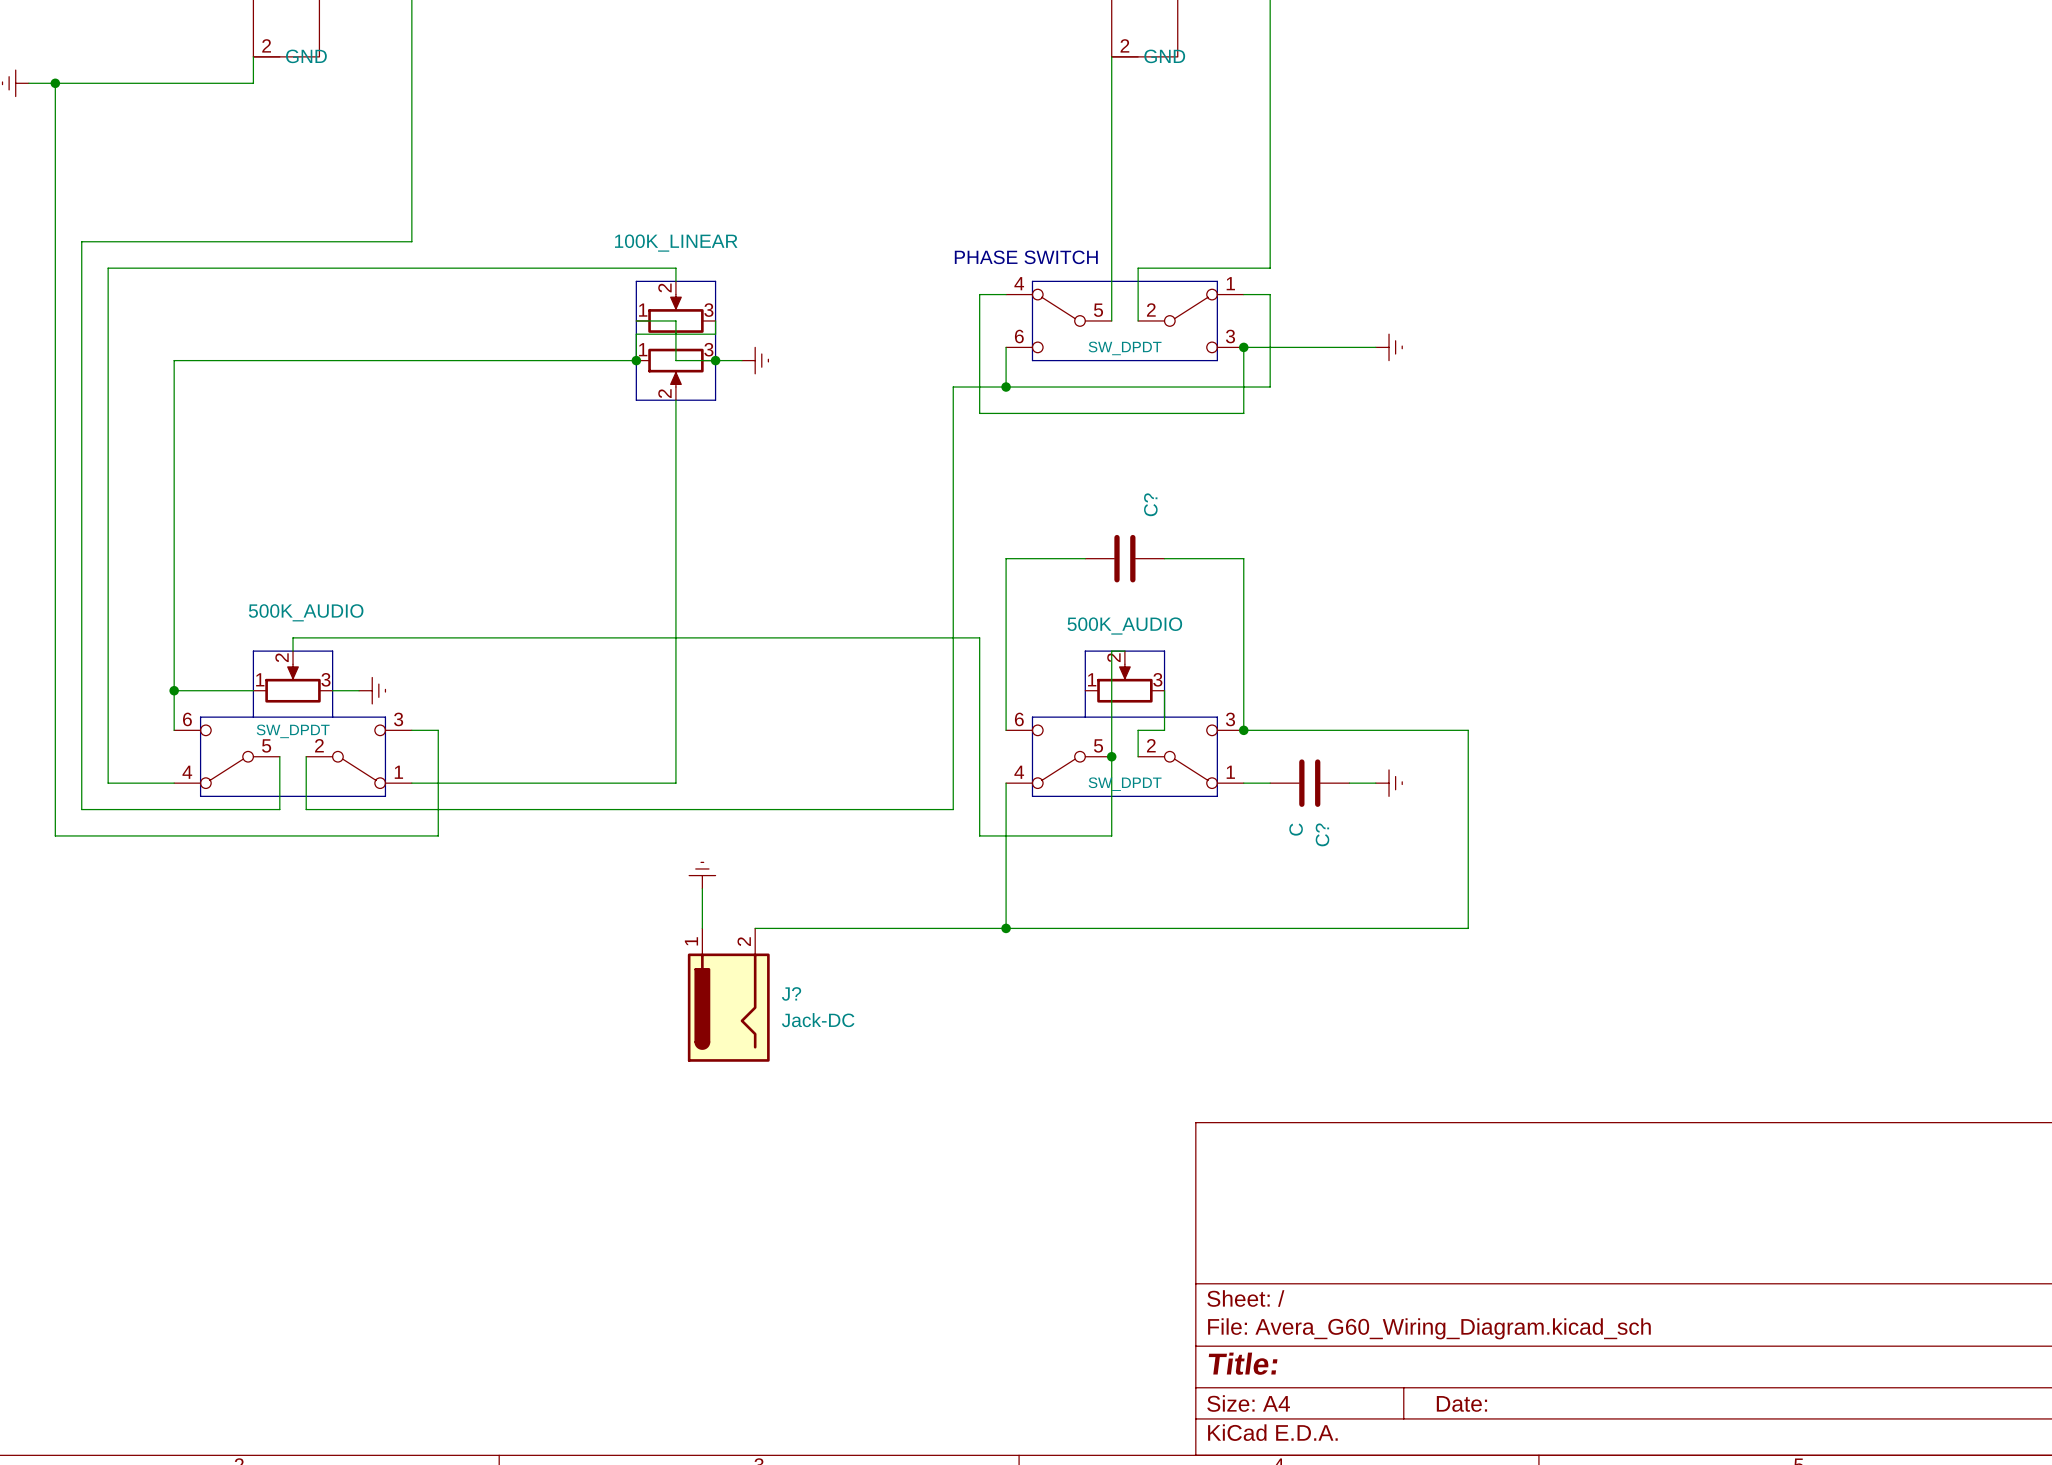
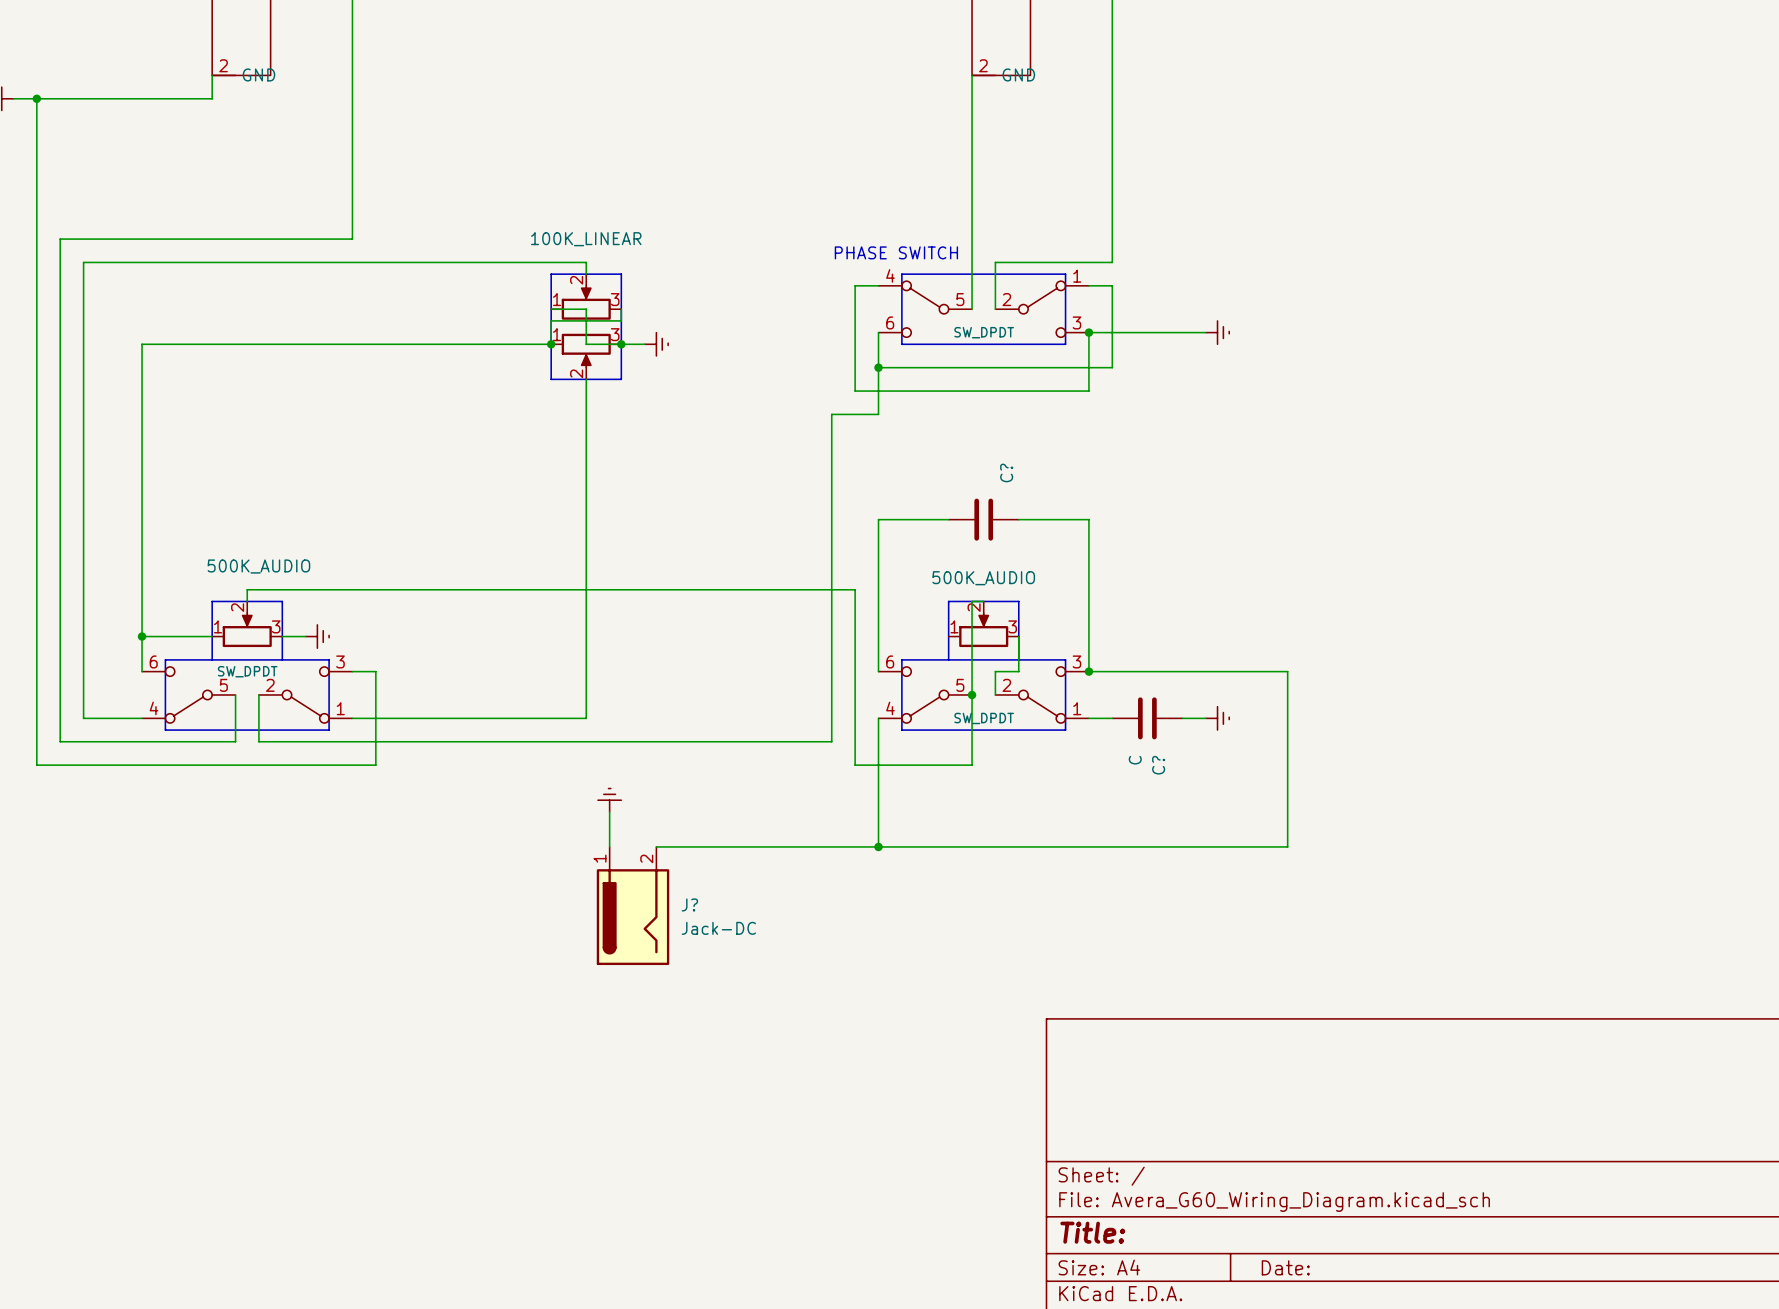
wire: (1006, 387) (953, 387) (953, 439) -> (878, 367) (878, 414) (831, 414)

